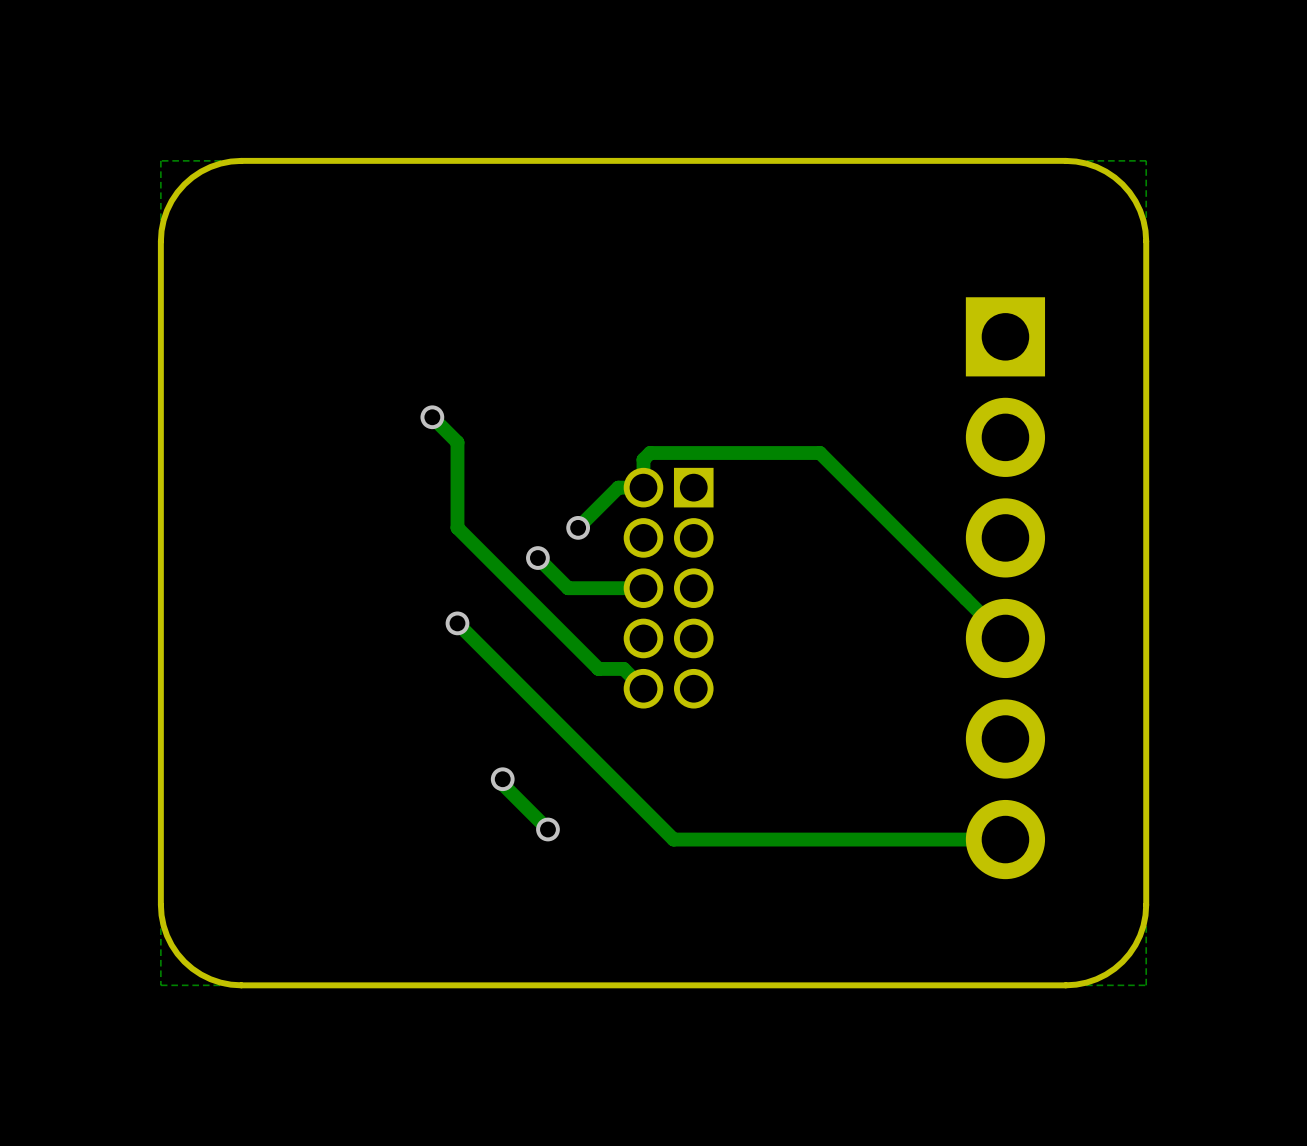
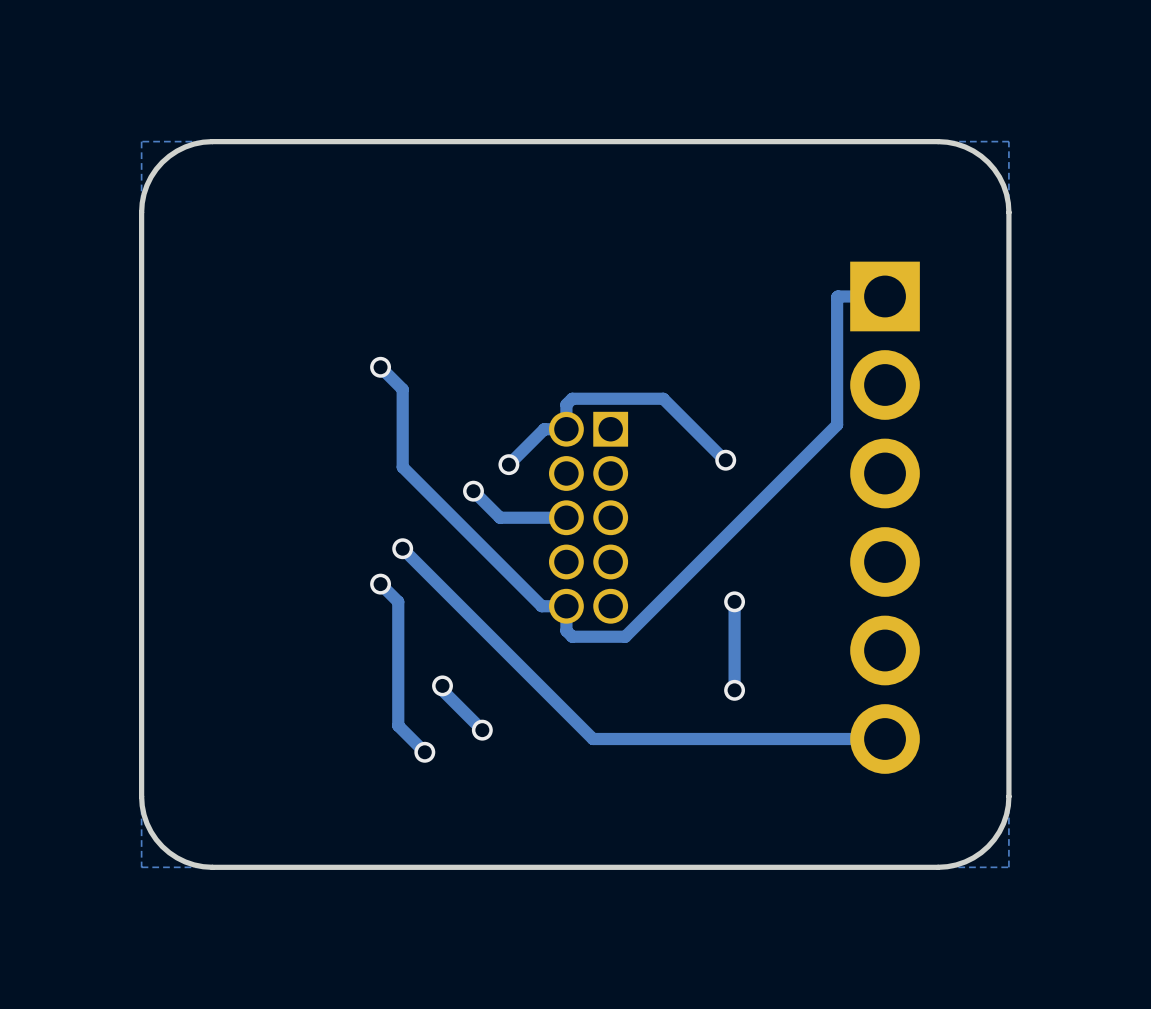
track: (753, 453) (820, 453) (1005, 638) -> (663, 398) (725, 460)
via: none -> (725, 460)
track: (457, 527) (598, 668) (623, 668) (643, 688) -> (402, 464) (402, 467) (541, 606) (566, 606) (566, 630) (572, 636) (625, 636) (837, 424) (837, 297) (885, 296)
track: none -> (380, 584) (398, 601) (398, 725) (424, 752)
via: none -> (380, 584)
track: none -> (734, 601) (734, 690)
via: none -> (734, 601)
via: none -> (734, 690)
via: none -> (424, 752)

